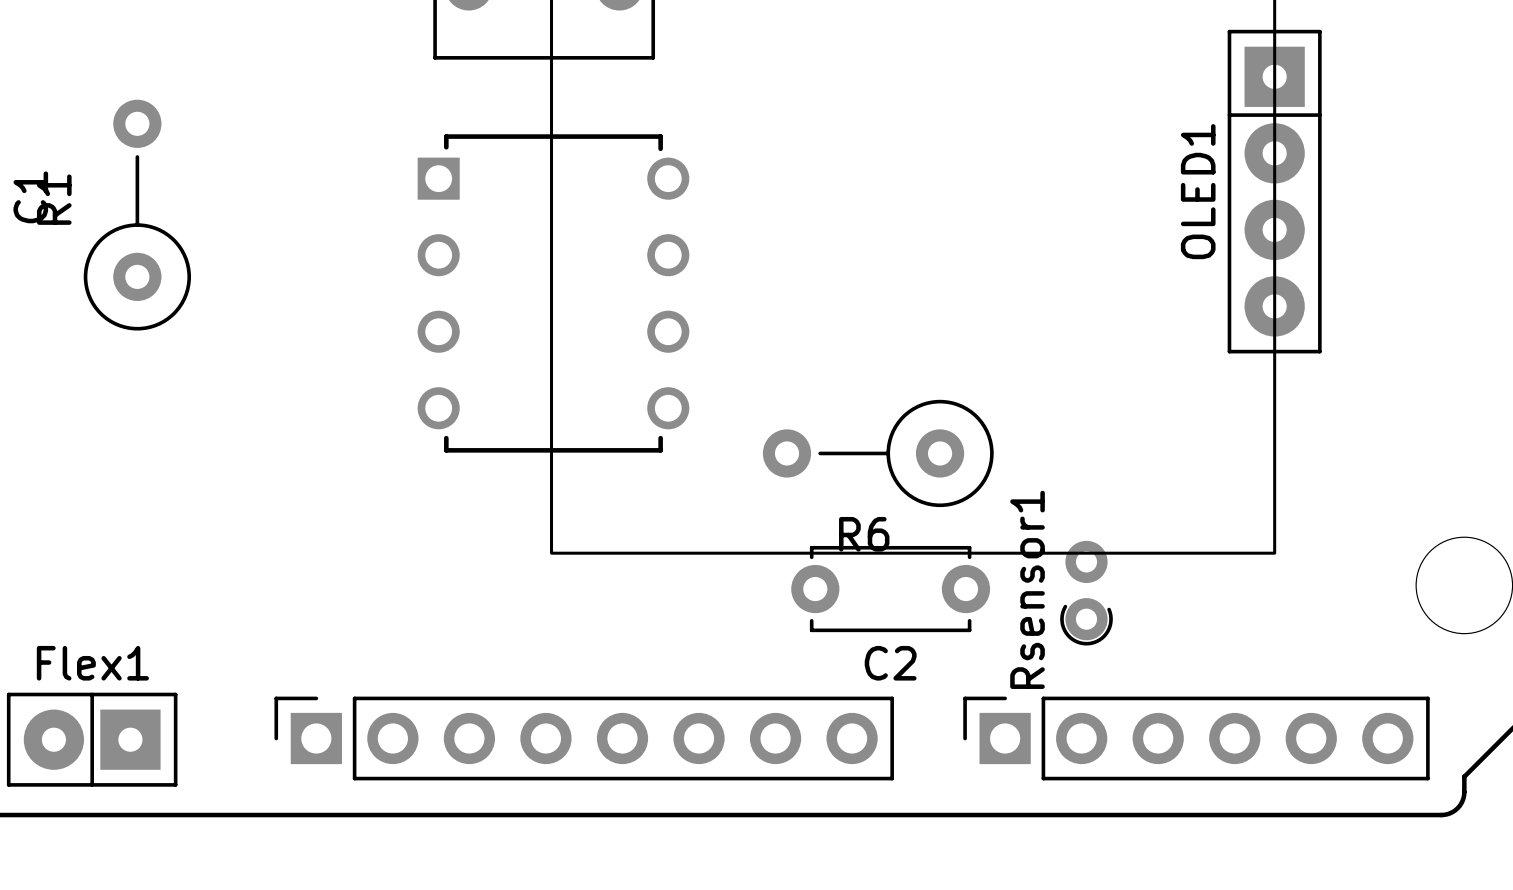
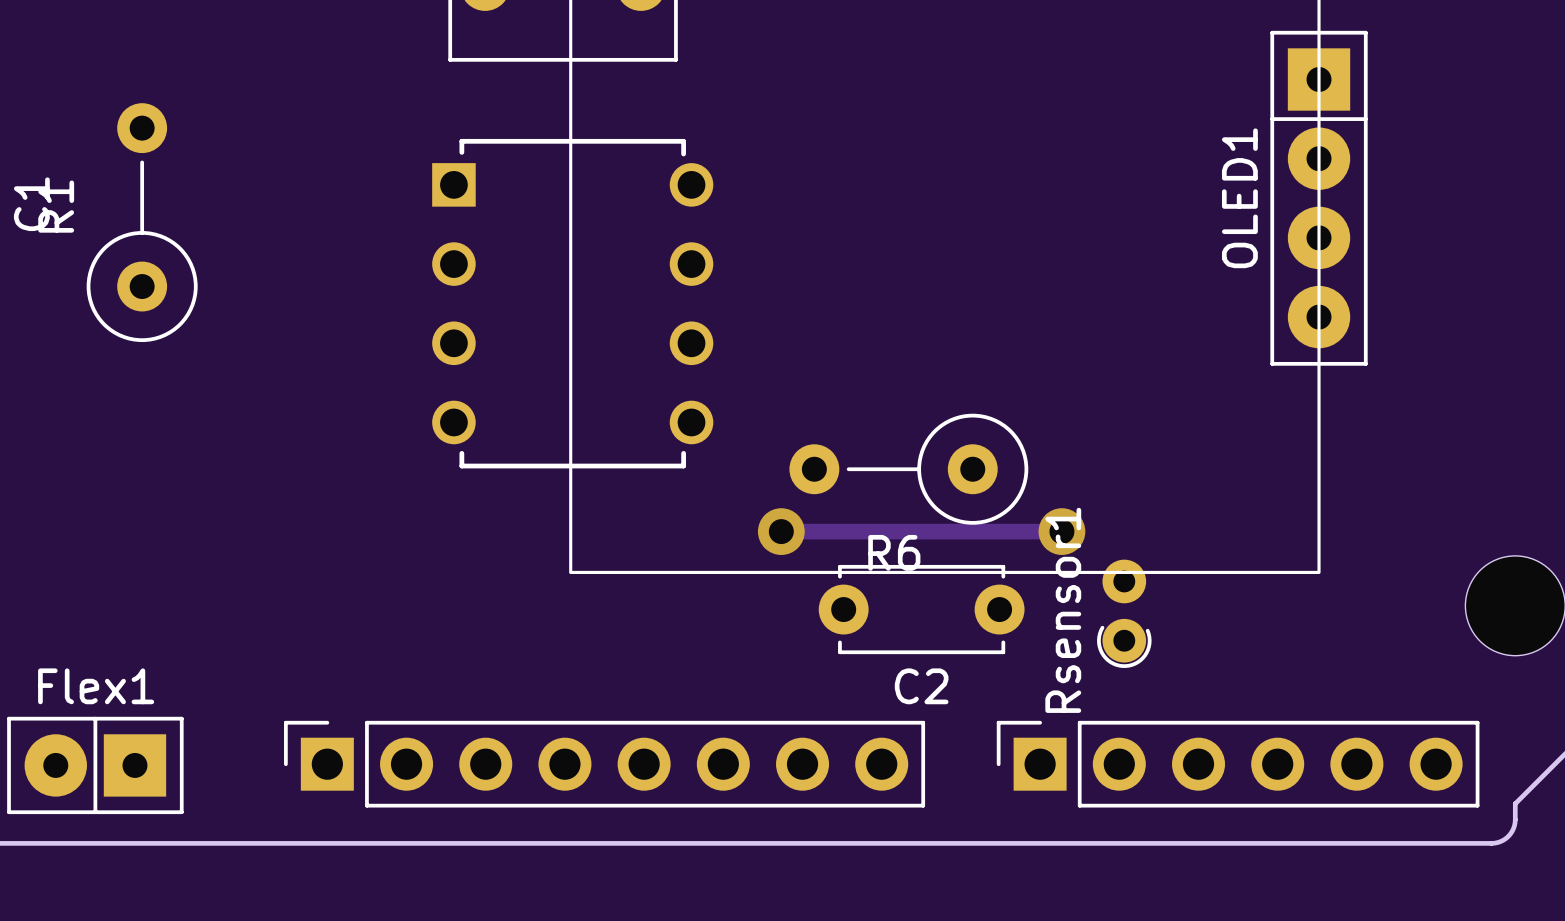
track: none -> (781, 531) (1061, 531)
via: none -> (781, 531)
via: none -> (1061, 531)

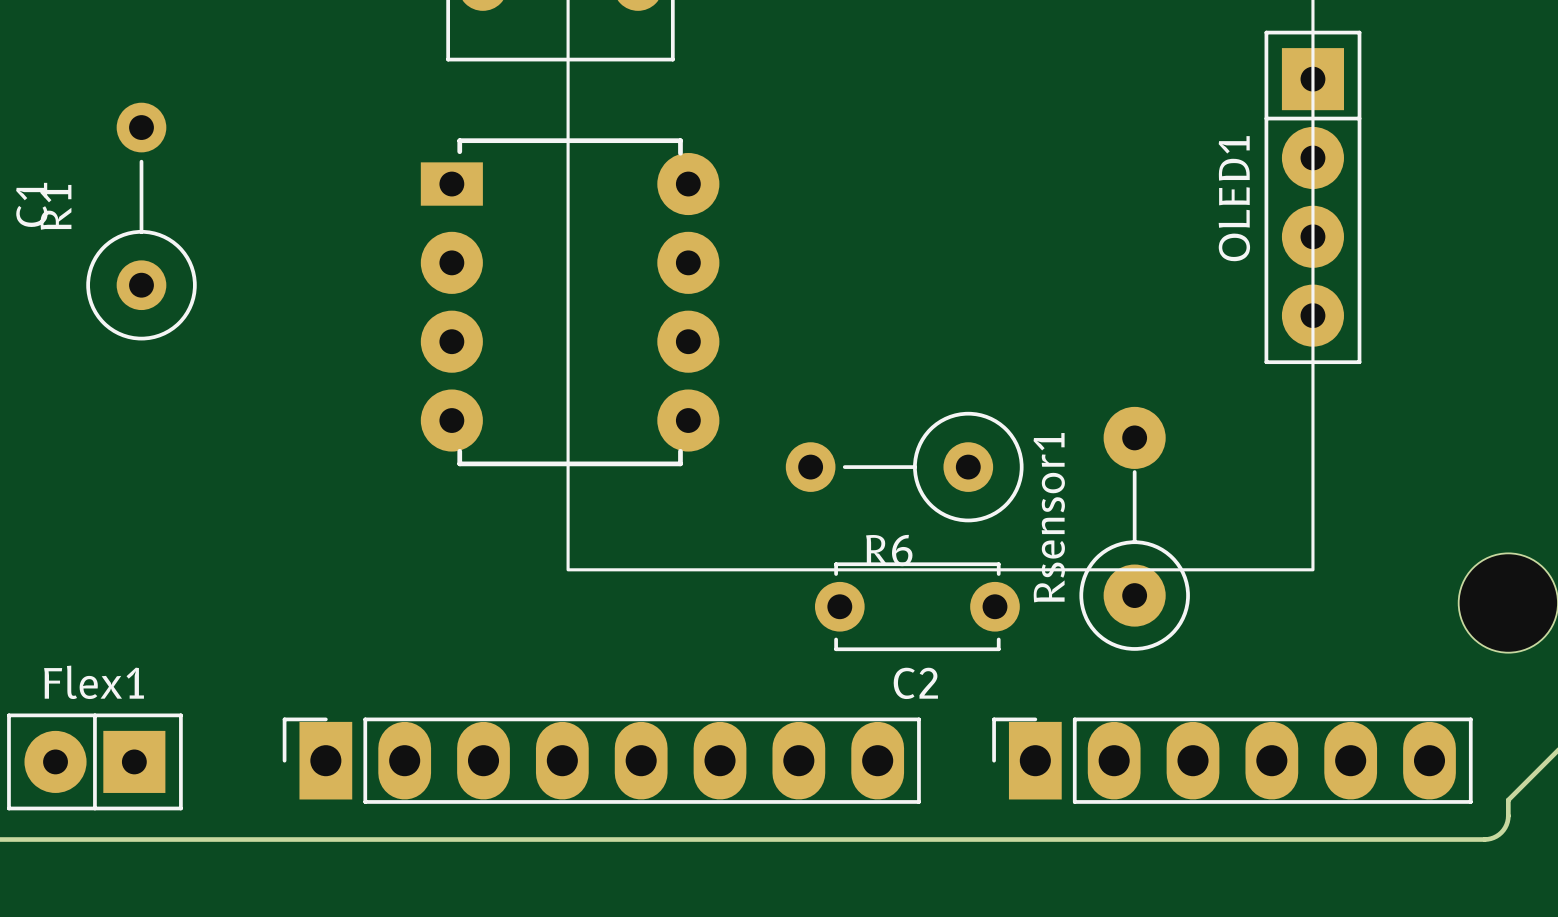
part footprint: [432, 138, 714, 469] -> [420, 138, 720, 467]
track: (781, 531) (1061, 531) -> none
via: (781, 531) -> none
via: (1061, 531) -> none
Rsensor1 footprint: [1097, 559, 1152, 668] -> [1079, 406, 1190, 651]
part footprint: [284, 720, 926, 808] -> [282, 717, 921, 804]
part footprint: [996, 720, 1480, 808] -> [992, 717, 1473, 804]

